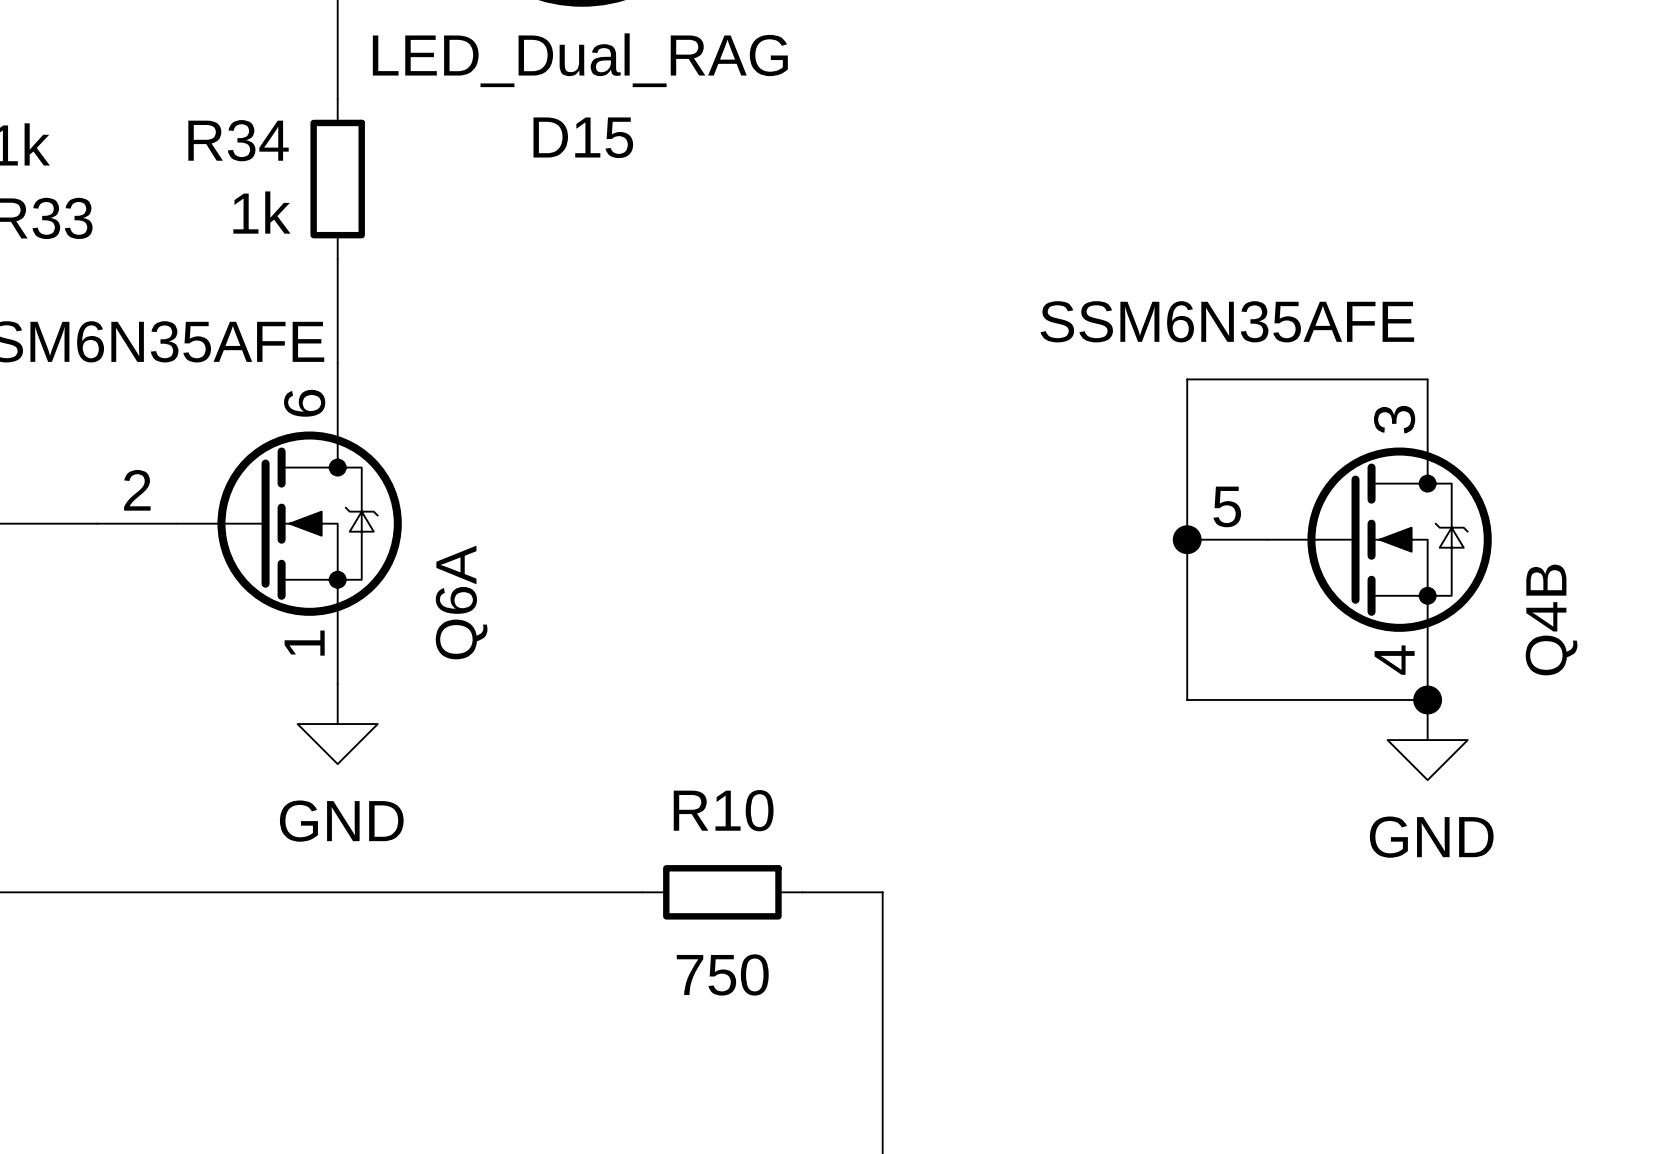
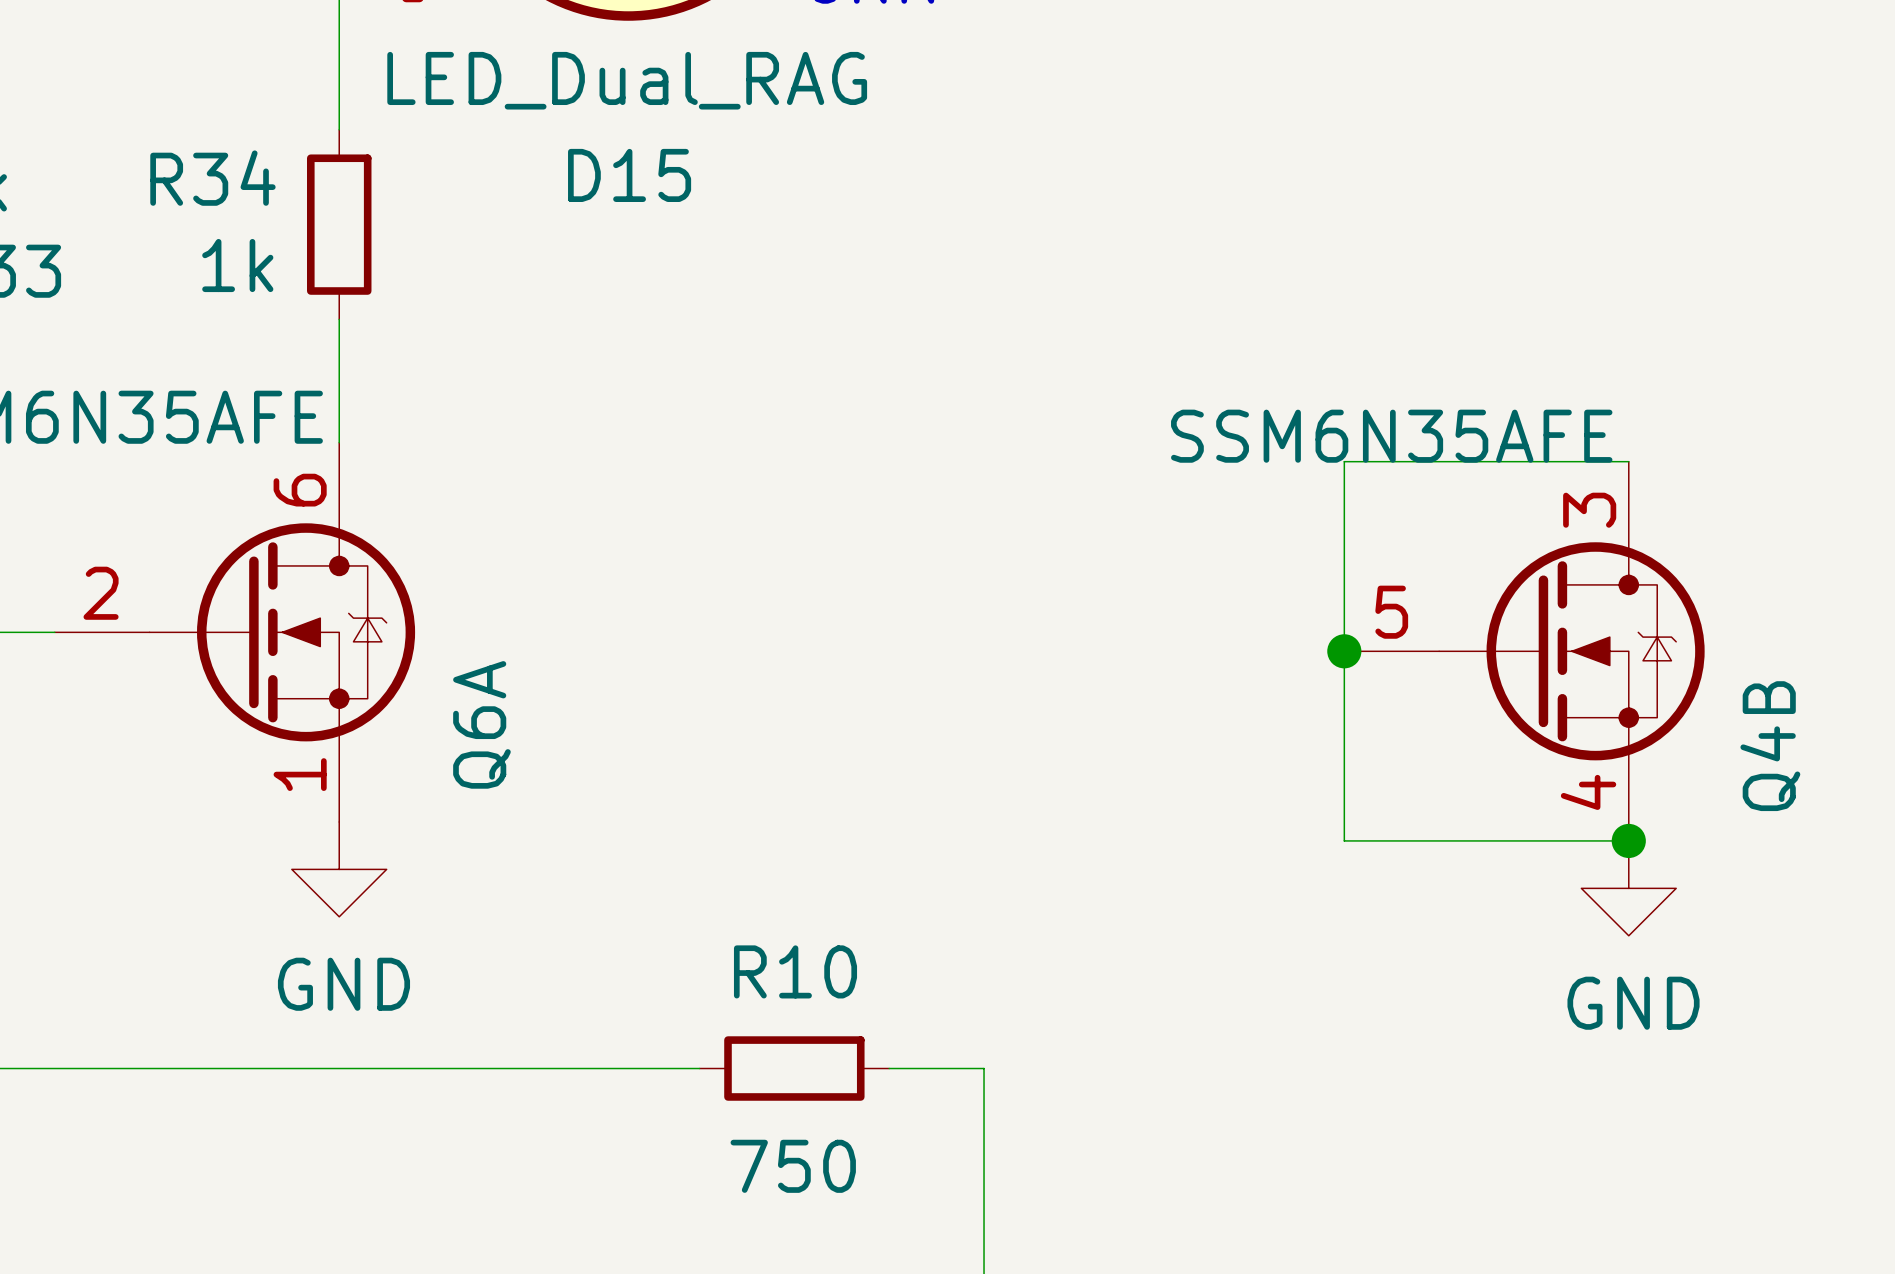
Q4B value position: SSM6N35AFE (1227, 321) -> SSM6N35AFE (1391, 436)

